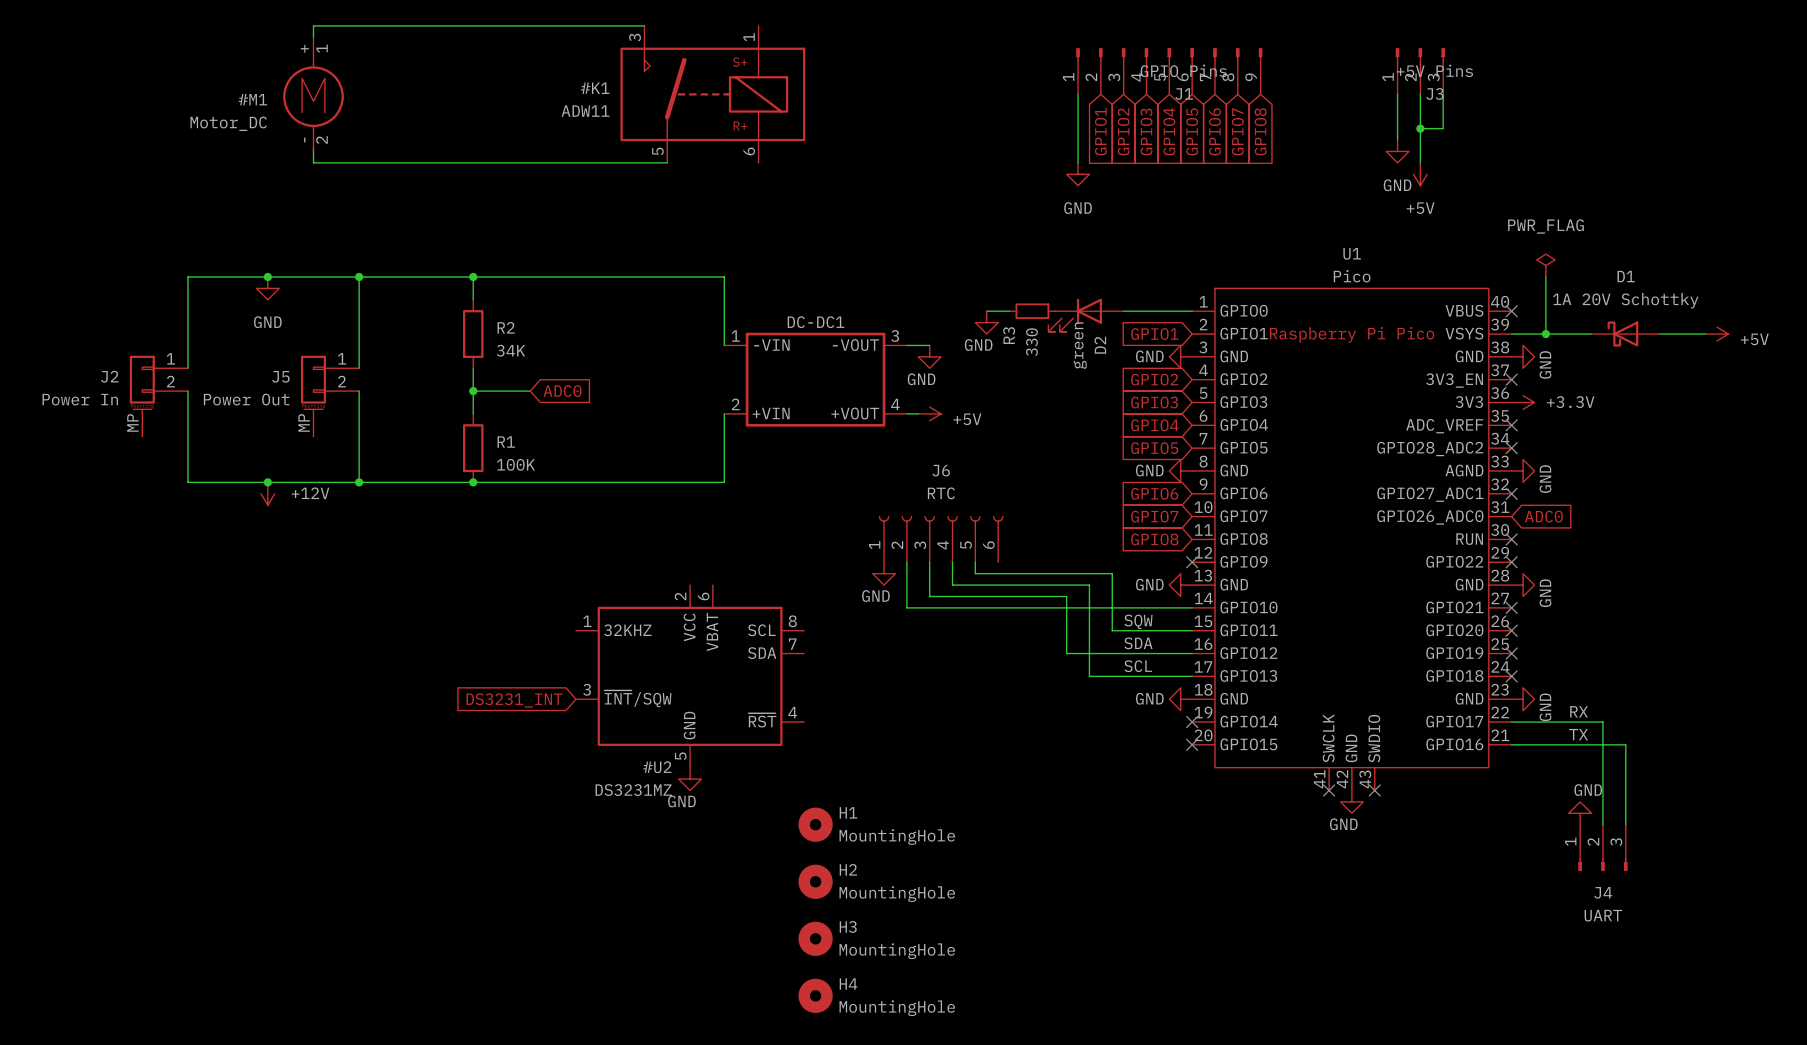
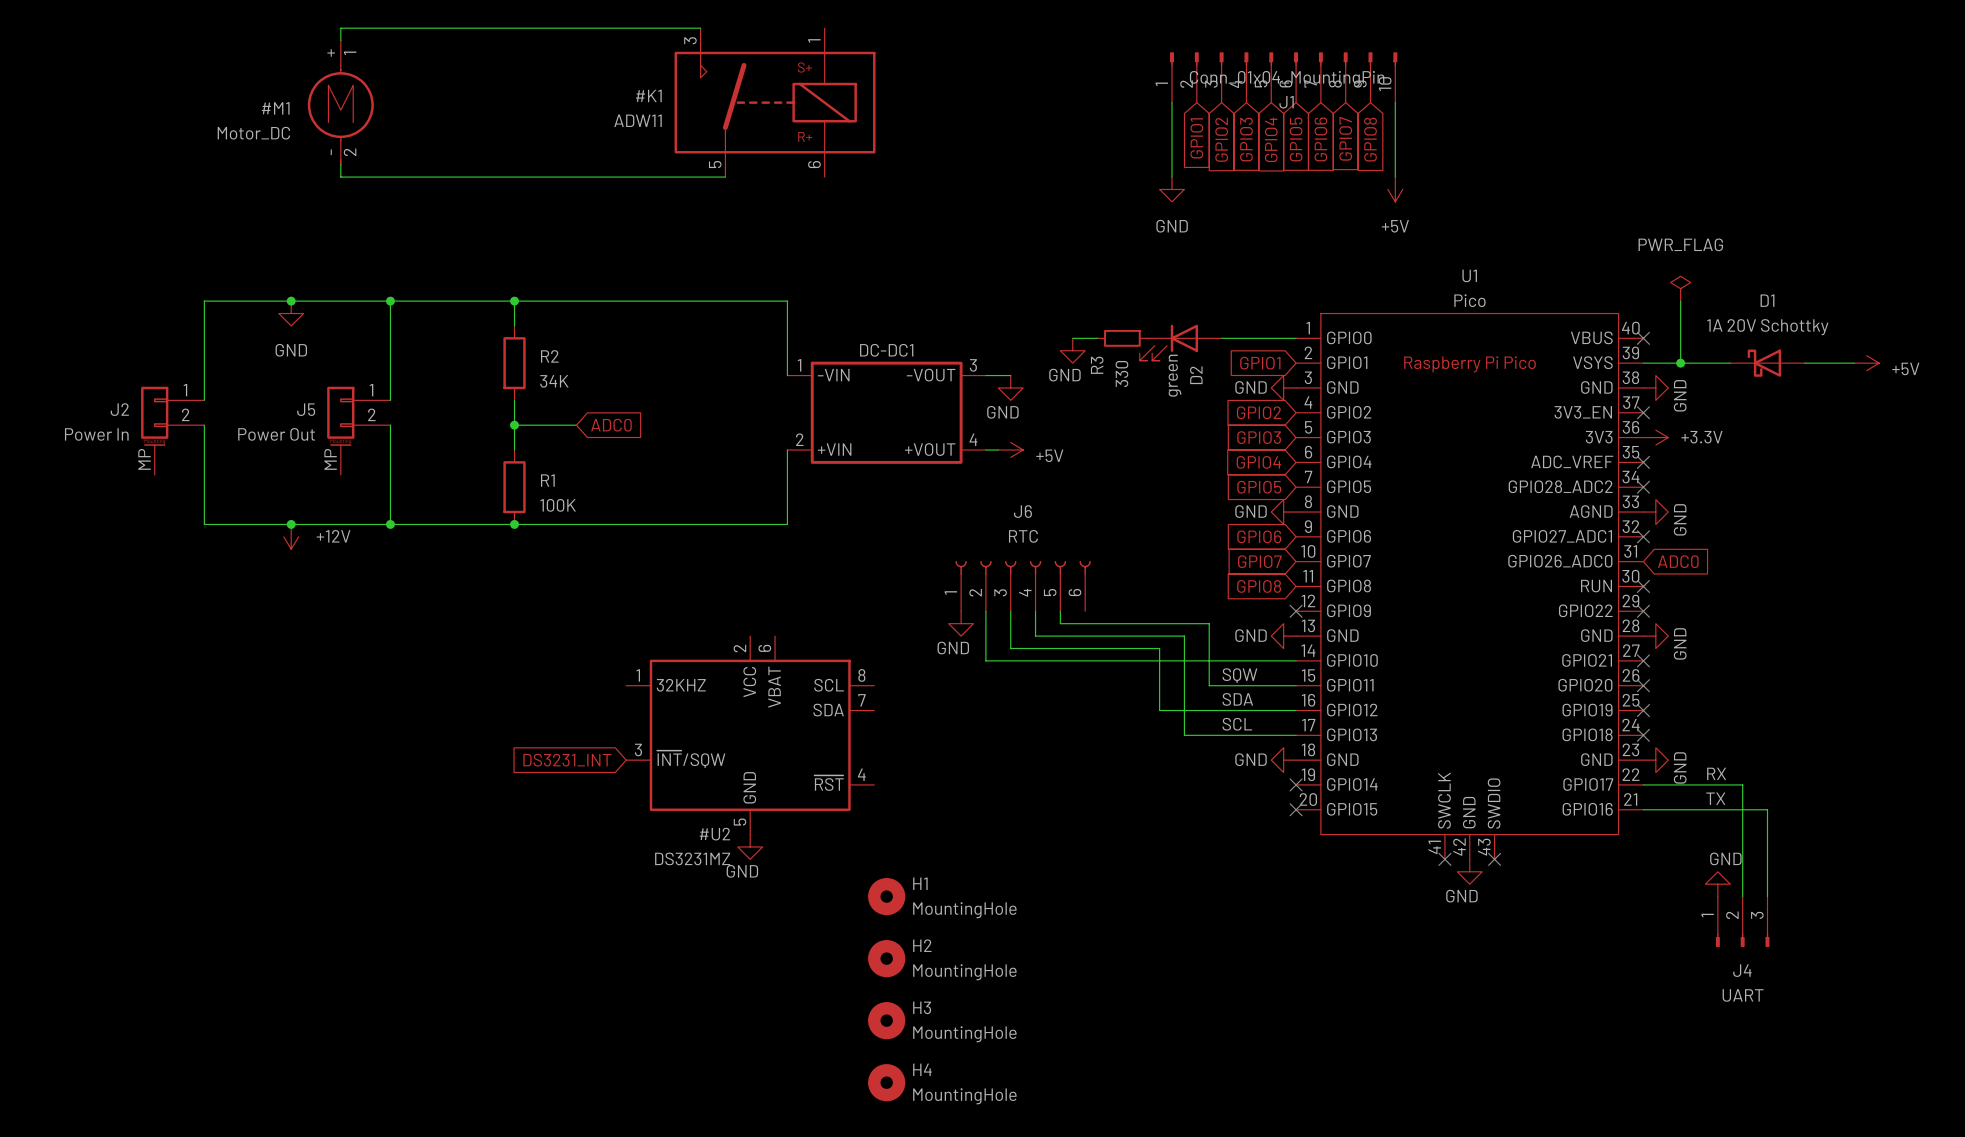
J1 symbol: [1076, 48, 1263, 95] -> [1170, 52, 1398, 103]
J1 value: GPIO Pins (1183, 70) -> Conn_01x04_MountingPin (1287, 79)
J3: +5V Pins (1420, 71) -> none
wire: (1397, 94) (1397, 140) -> none
wire: (1420, 94) (1420, 162) -> (1395, 102) (1395, 177)
wire: (1443, 94) (1443, 128) (1420, 128) -> none
junction: (1420, 128) -> none
power symbol: GND (1397, 151) -> none
power symbol position: +5V (1420, 174) -> +5V (1395, 189)

